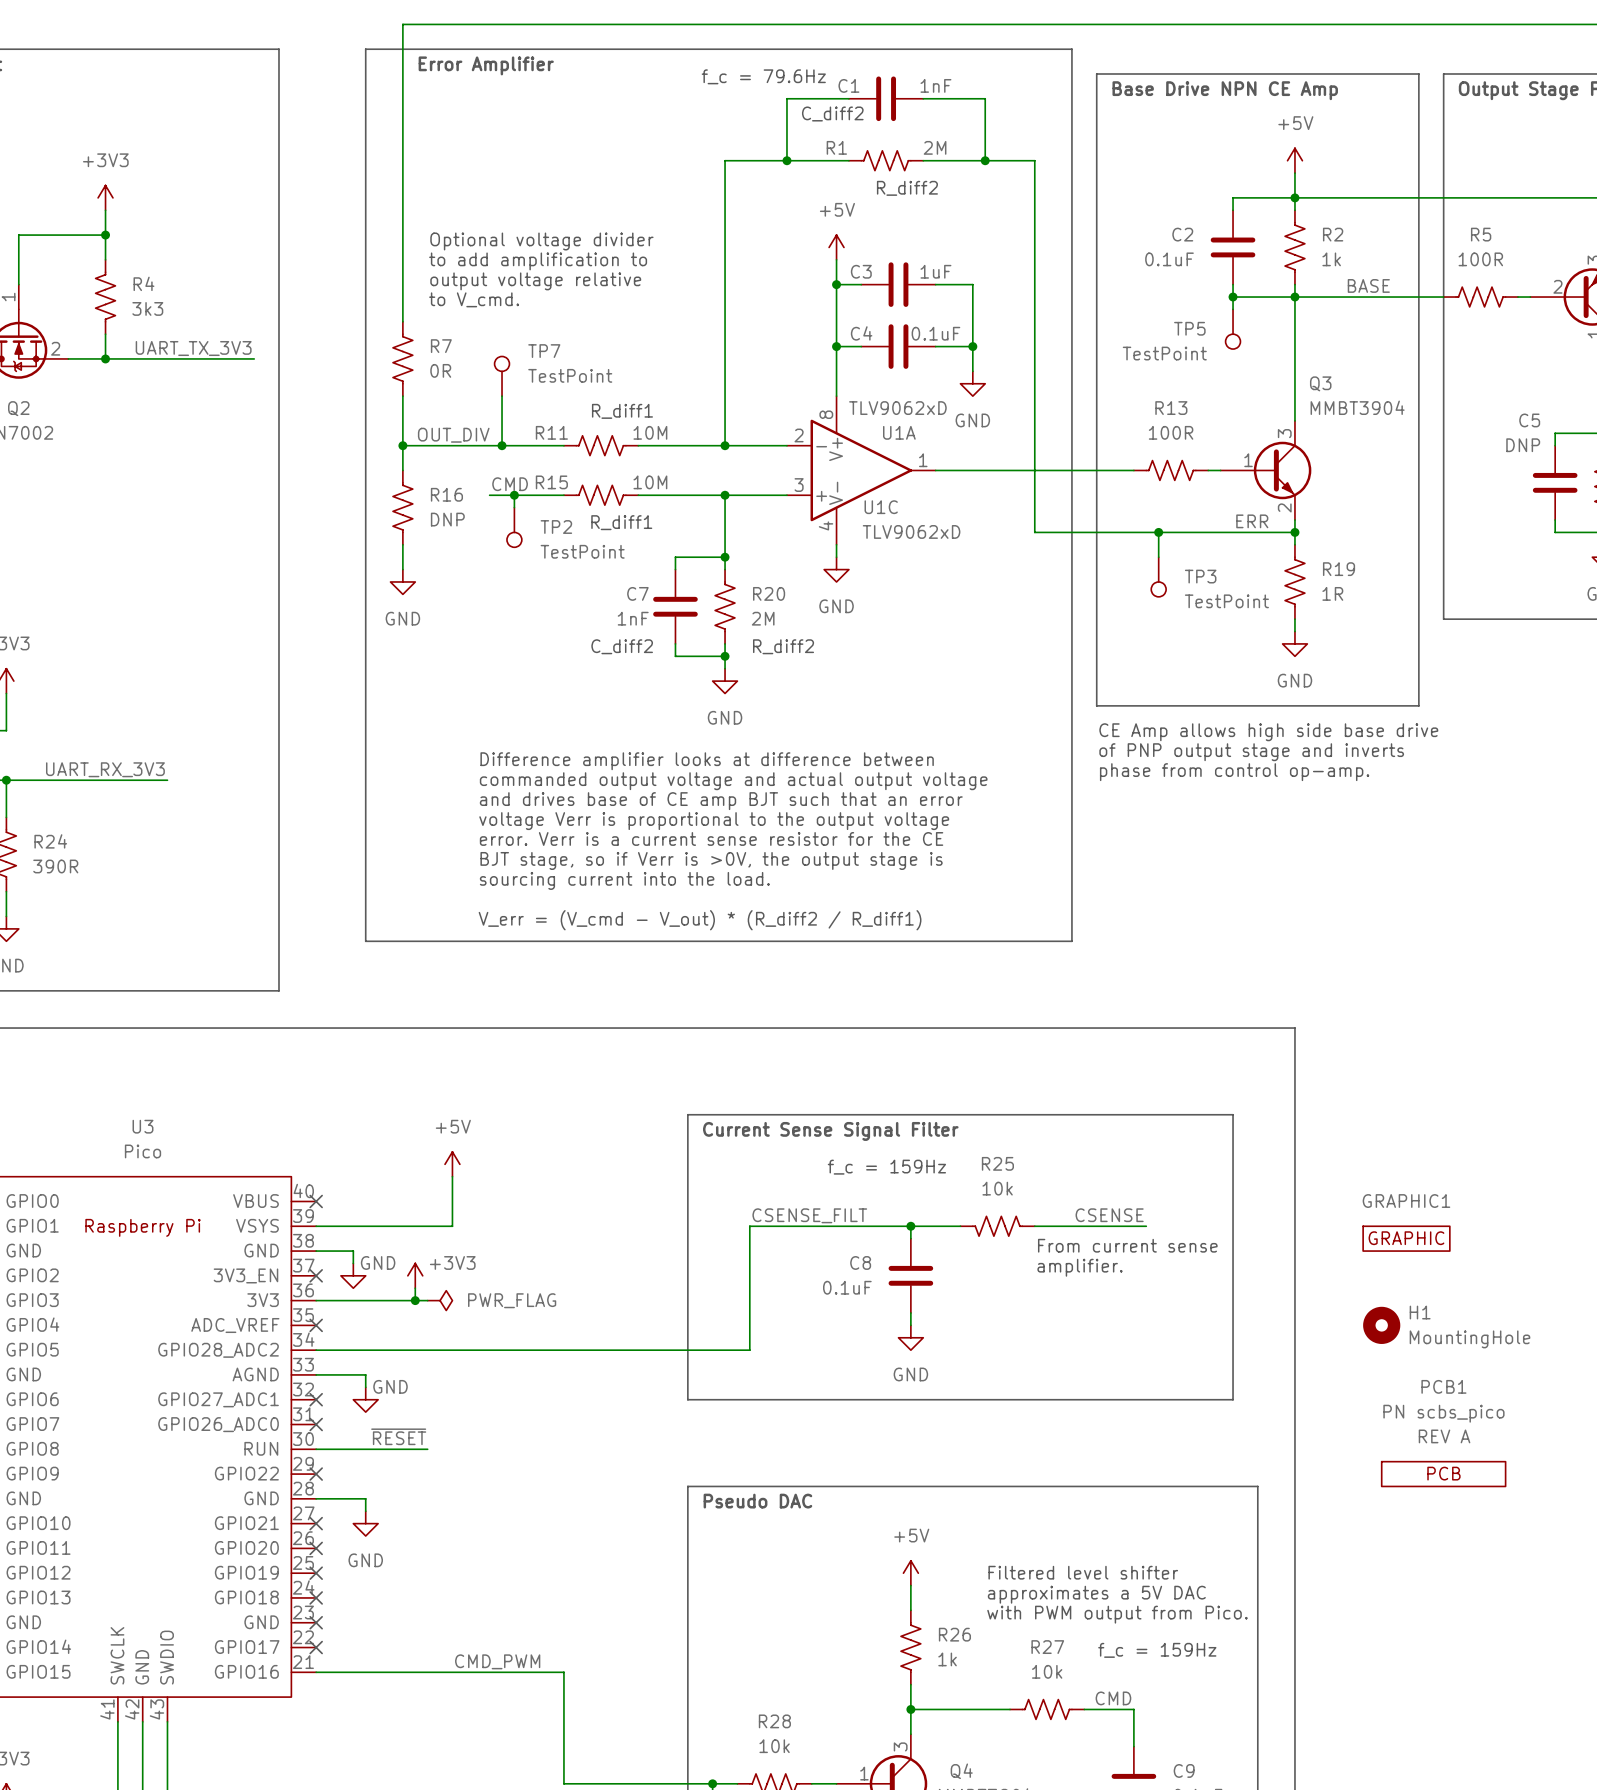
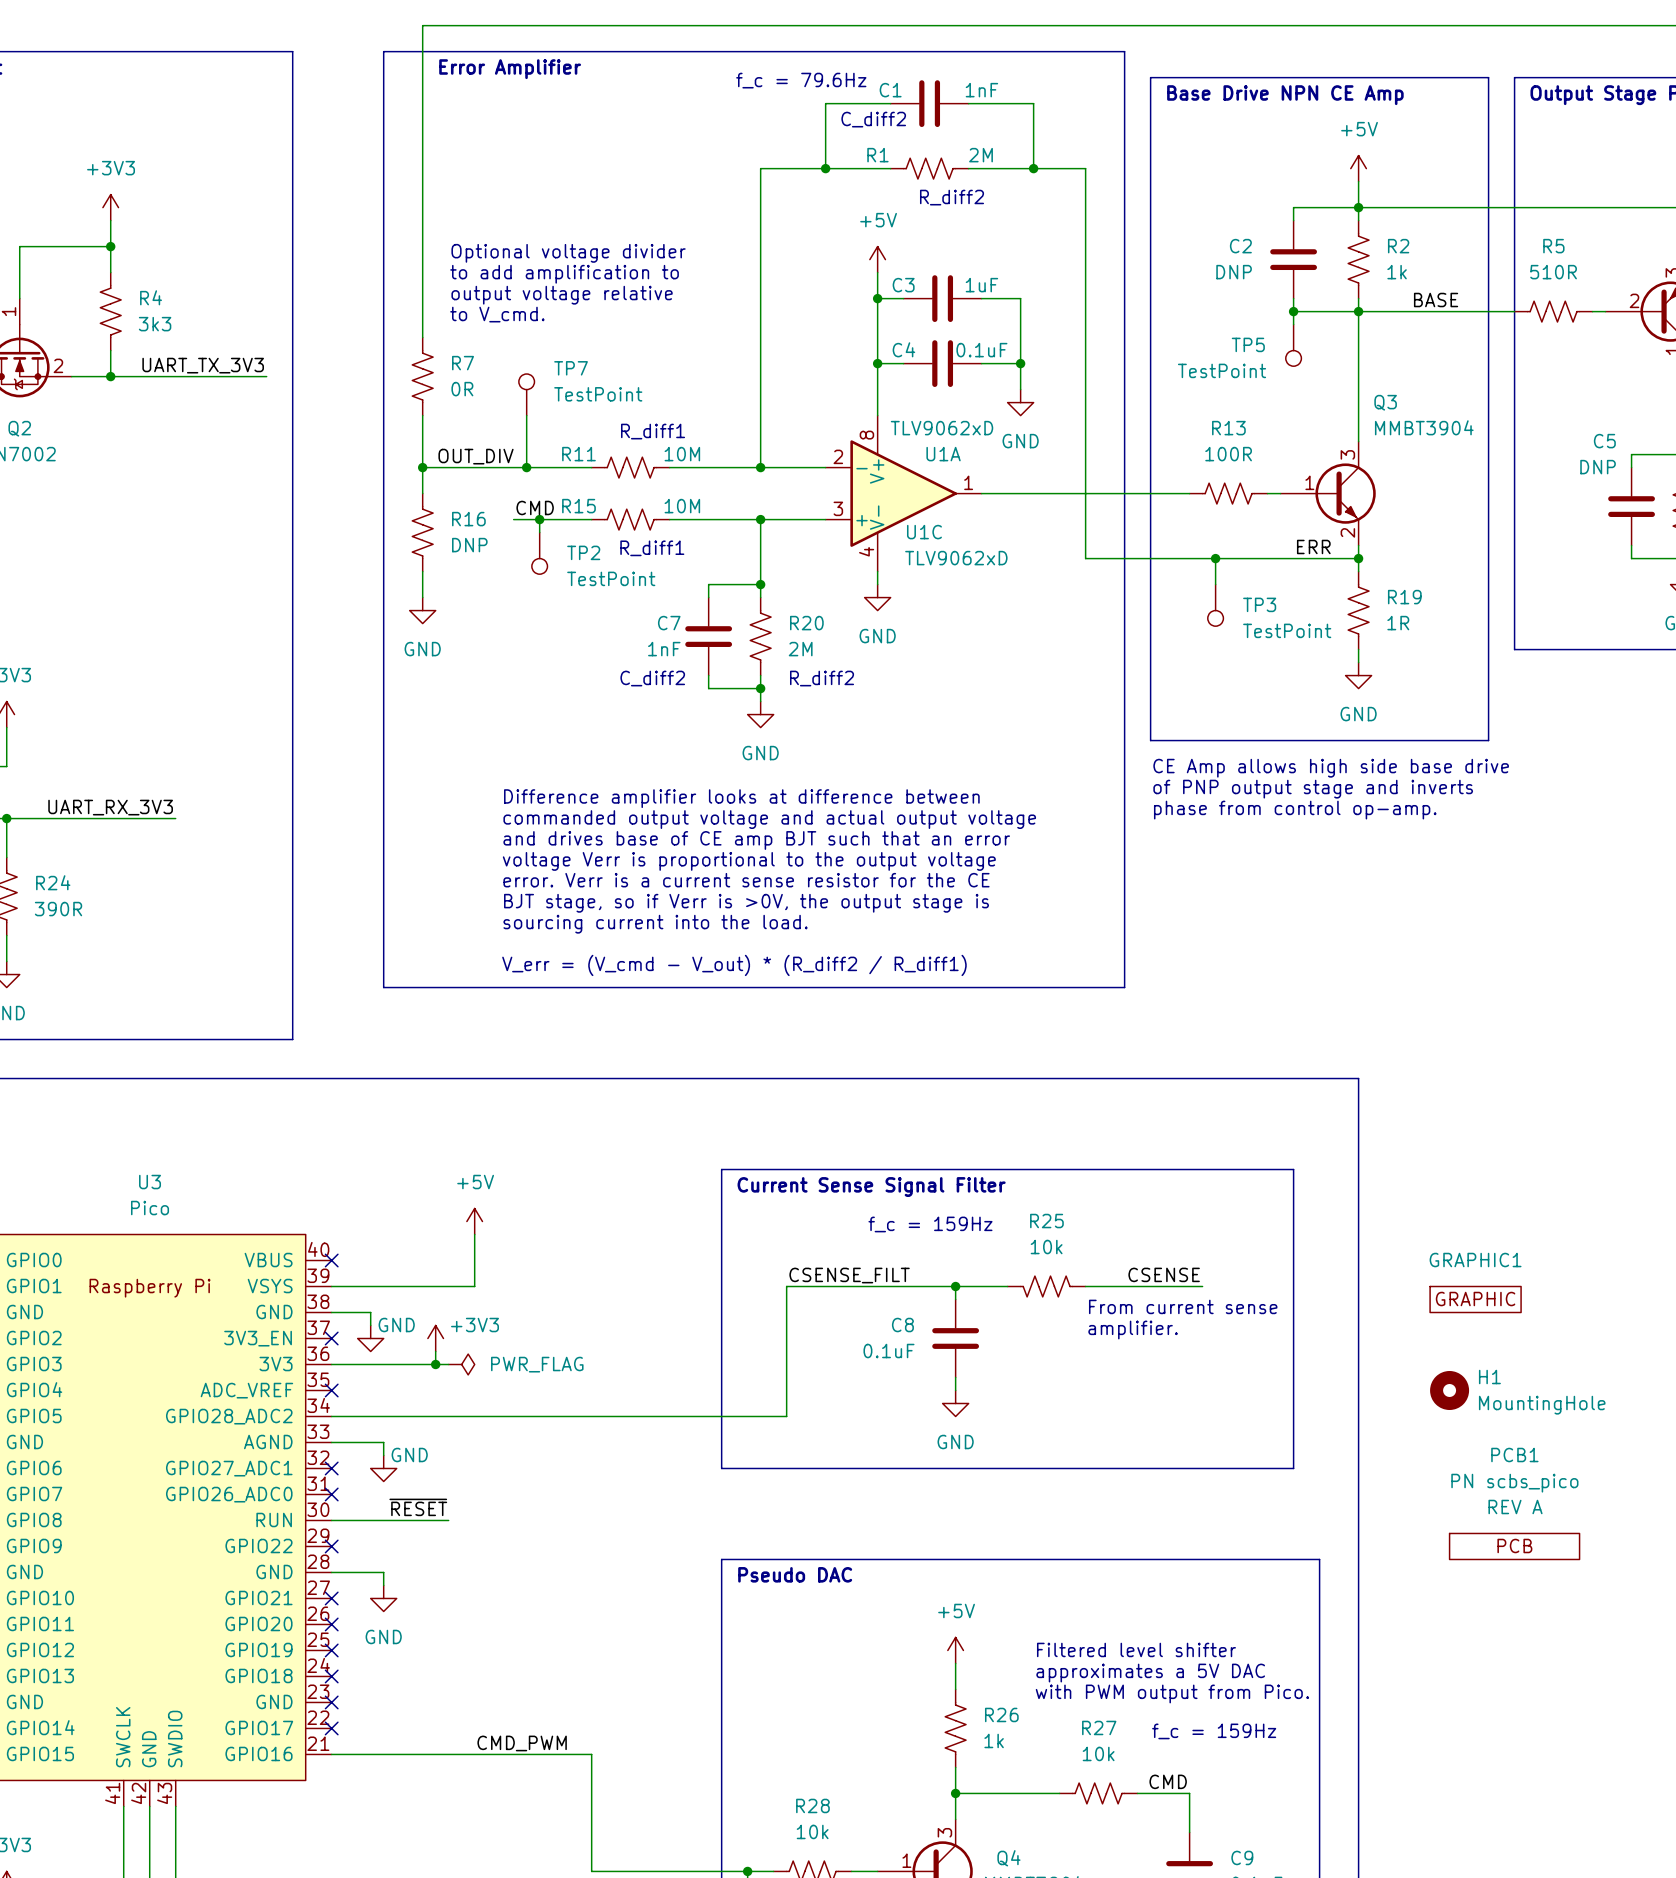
C2 value: 0.1uF (1169, 259) -> DNP (1234, 272)
R5 value: 100R (1480, 259) -> 510R (1553, 272)

